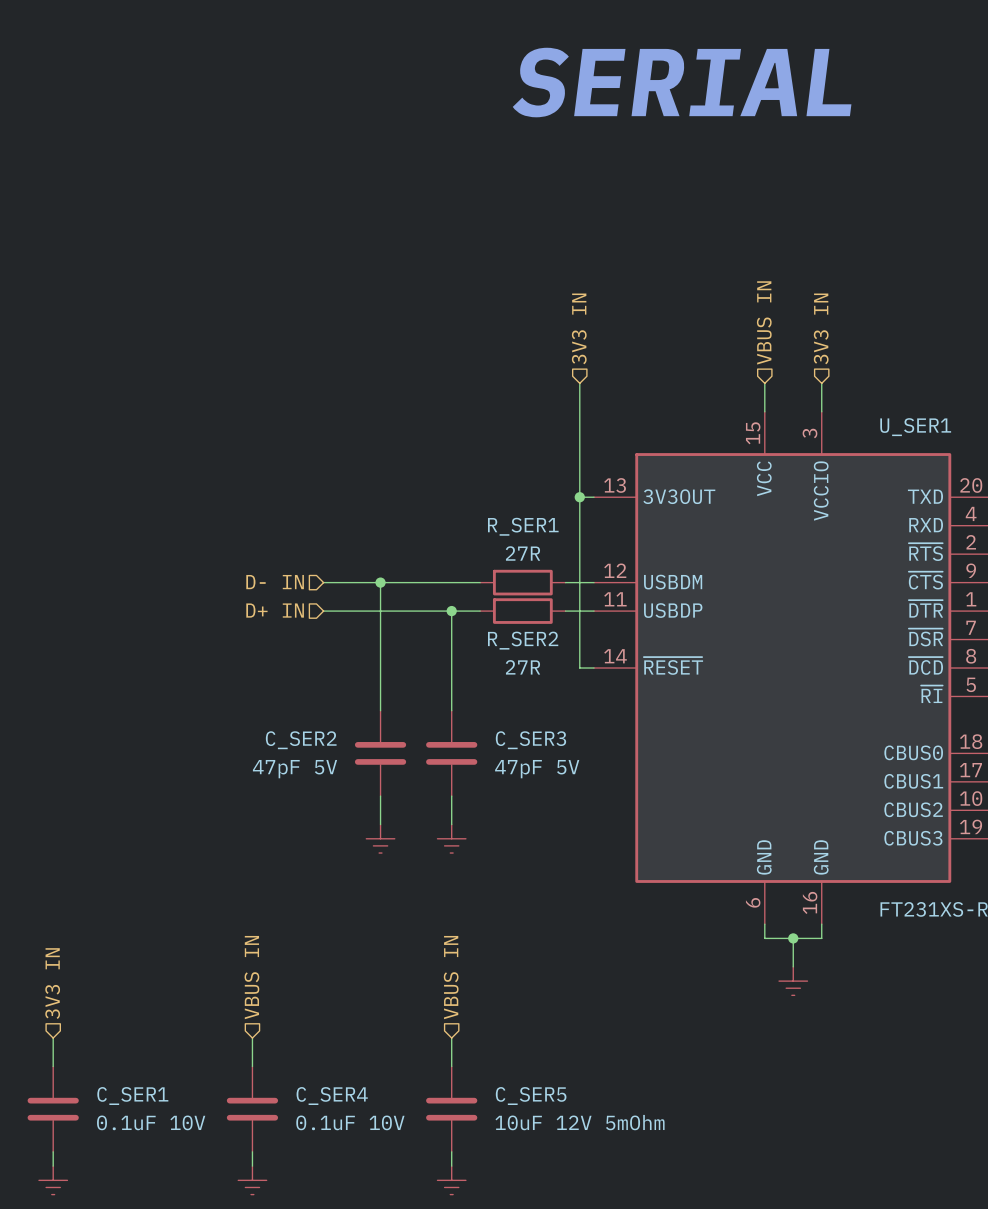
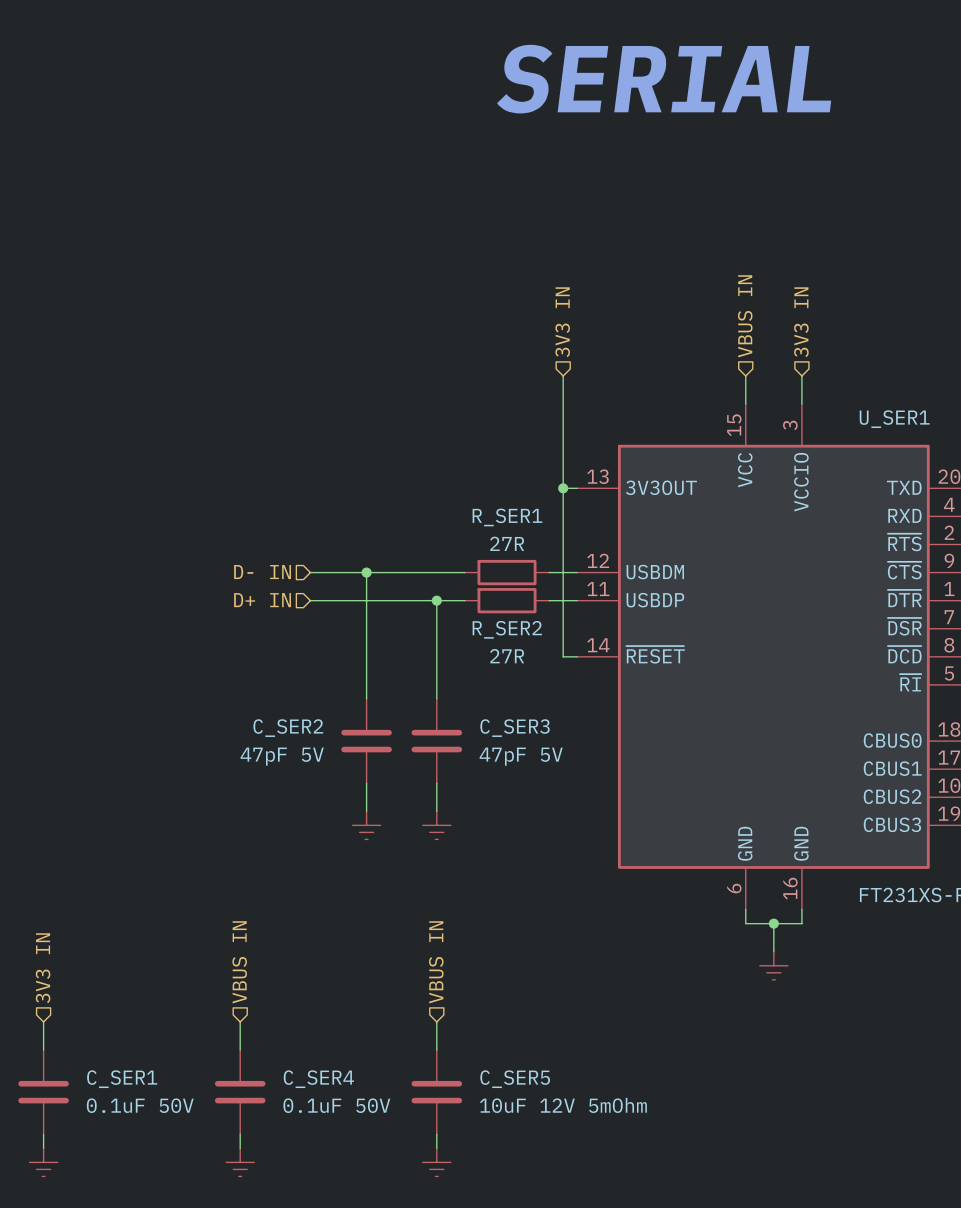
C_SER1 value: 0.1uF 10V (151, 1122) -> 0.1uF 50V (140, 1105)
C_SER4 value: 0.1uF 10V (350, 1122) -> 0.1uF 50V (336, 1105)

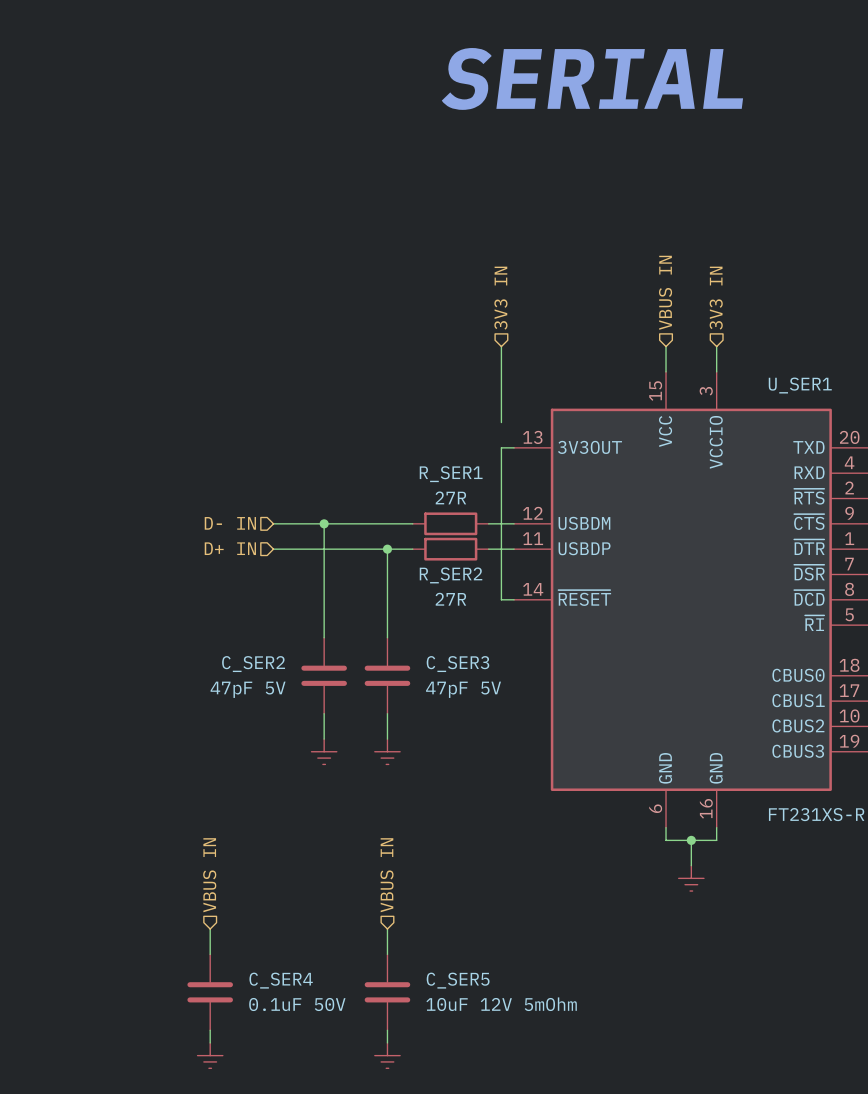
wire: (563, 460) (563, 488) -> none
junction: (563, 488) -> none
hierarchical label: 3V3 IN (43, 968) -> none
wire: (43, 1021) (43, 1050) -> none
C_SER1: 0.1uF 50V (43, 1092) -> none
wire: (43, 1134) (43, 1148) -> none
power symbol: (43, 1162) -> none

